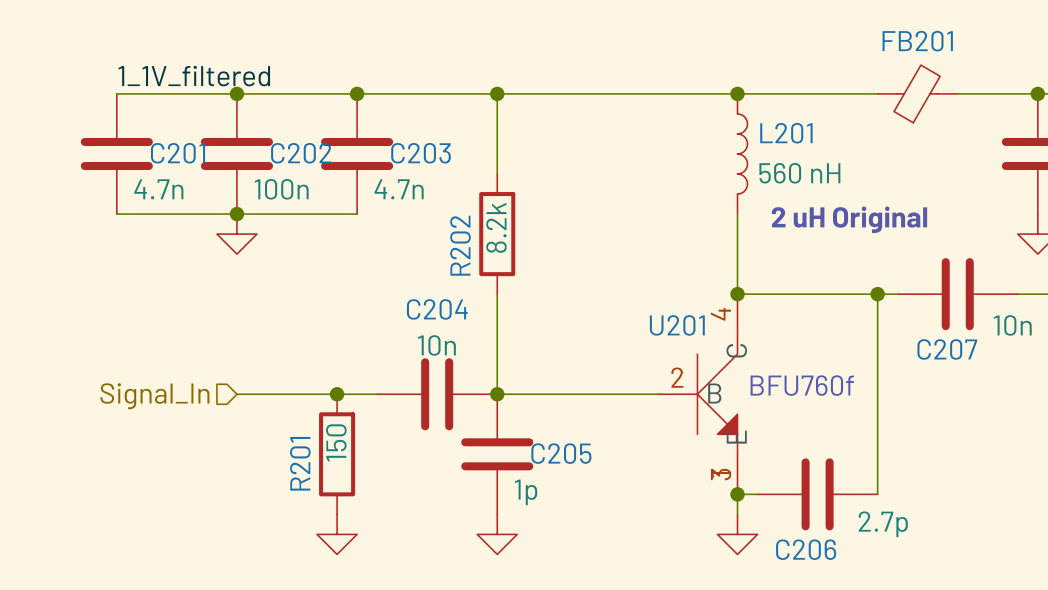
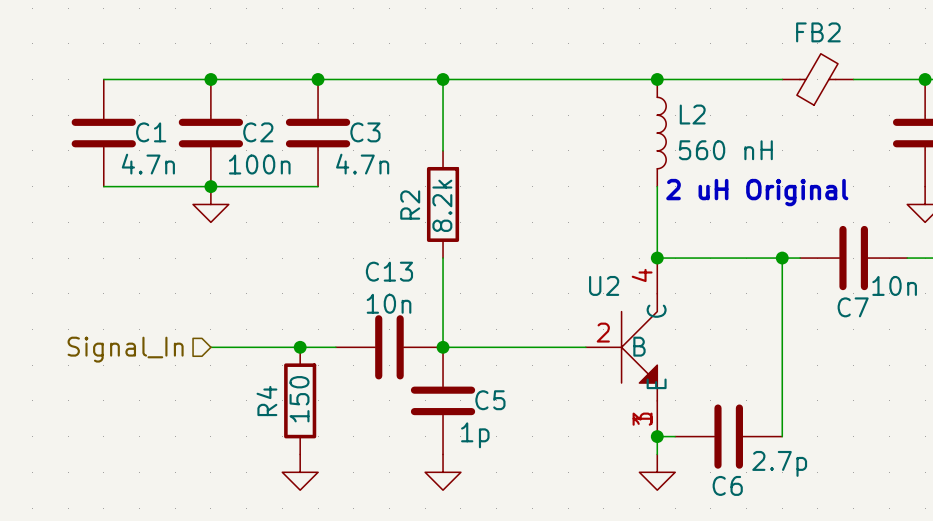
FB201 name: FB201 (917, 41) -> FB2 (818, 32)
label: 1_1V_filtered (194, 76) -> none
L201 name: L201 (786, 133) -> L2 (692, 114)
C201 name: C201 (178, 153) -> C1 (151, 132)
C202 name: C202 (301, 153) -> C2 (258, 132)
C203 name: C203 (421, 153) -> C3 (365, 132)
R202 name: R202 (460, 245) -> R2 (410, 205)
C204 name: C204 (437, 309) -> C13 (389, 271)
U201 name: U201 (677, 325) -> U2 (604, 285)
C207 name: C207 (947, 349) -> C7 (853, 307)
text: BFU760f (802, 385) -> none
C205 name: C205 (561, 453) -> C5 (490, 400)
R201 name: R201 (300, 463) -> R4 (266, 401)
C206 name: C206 (806, 549) -> C6 (727, 485)

